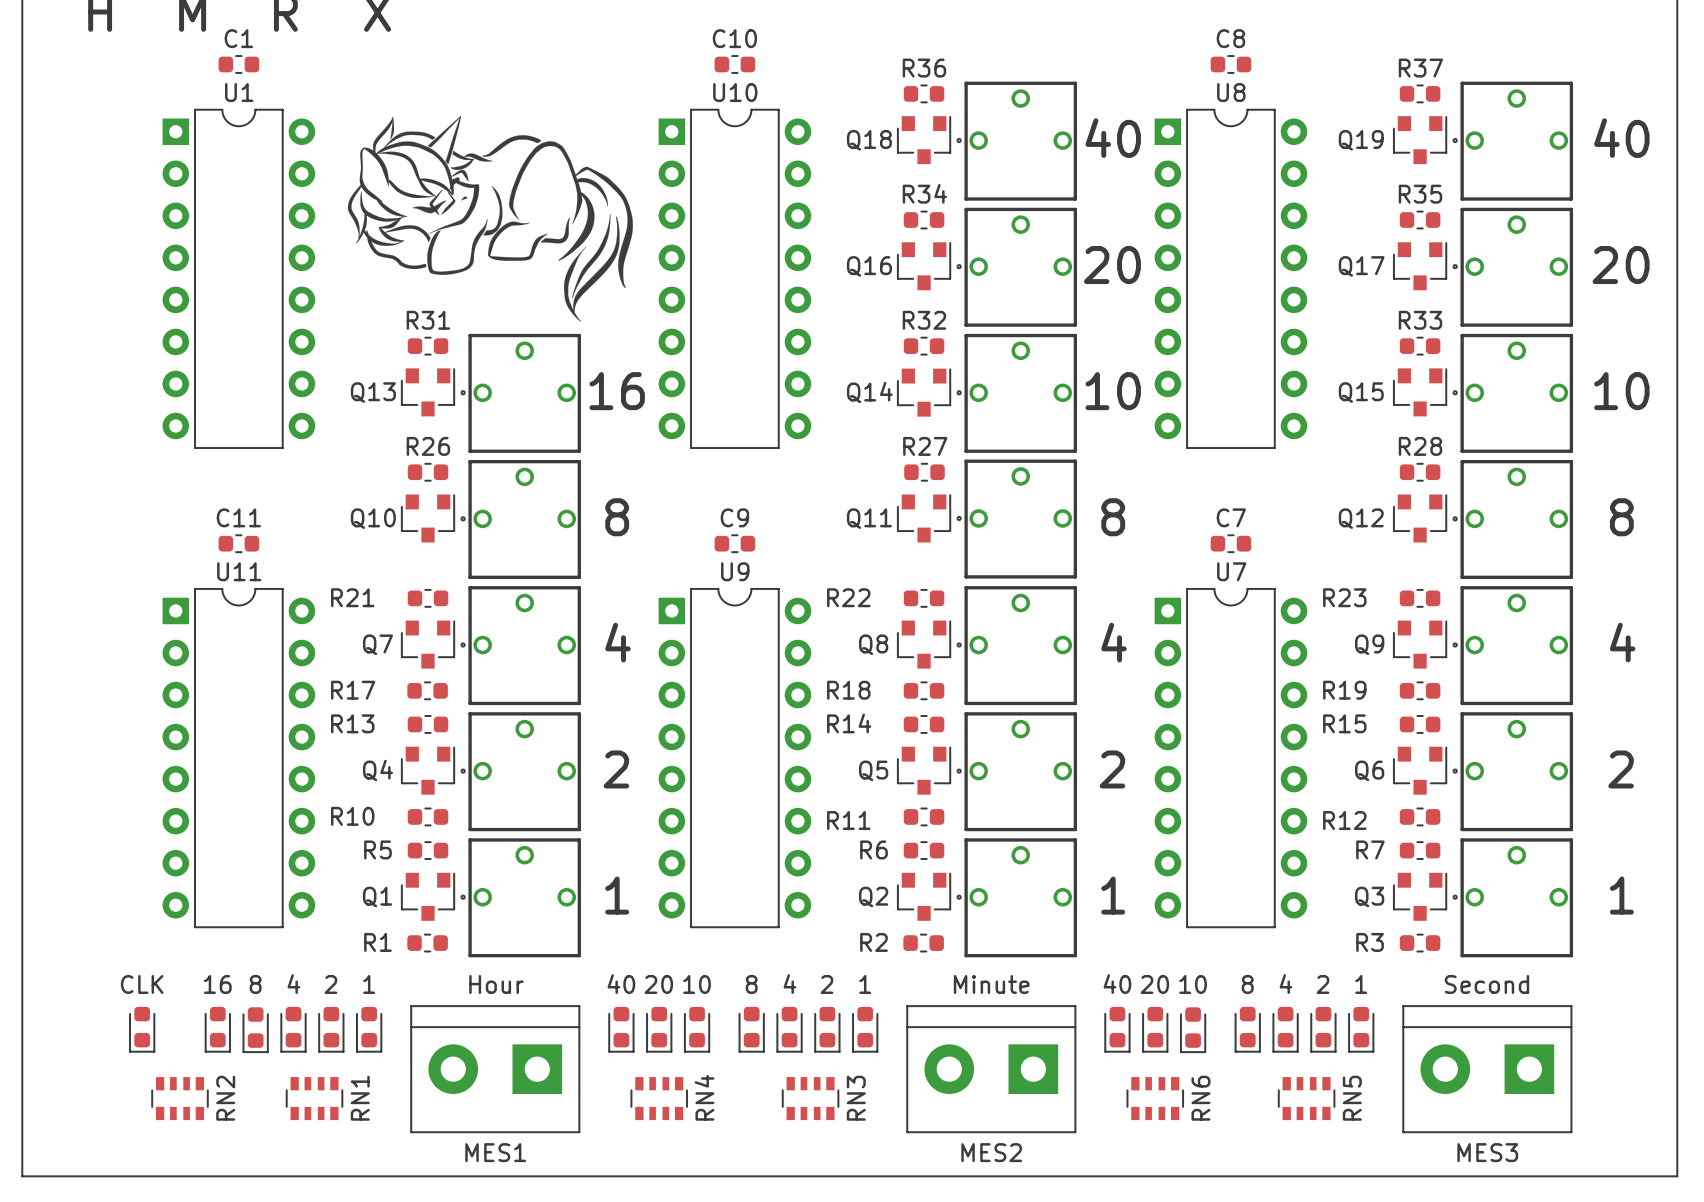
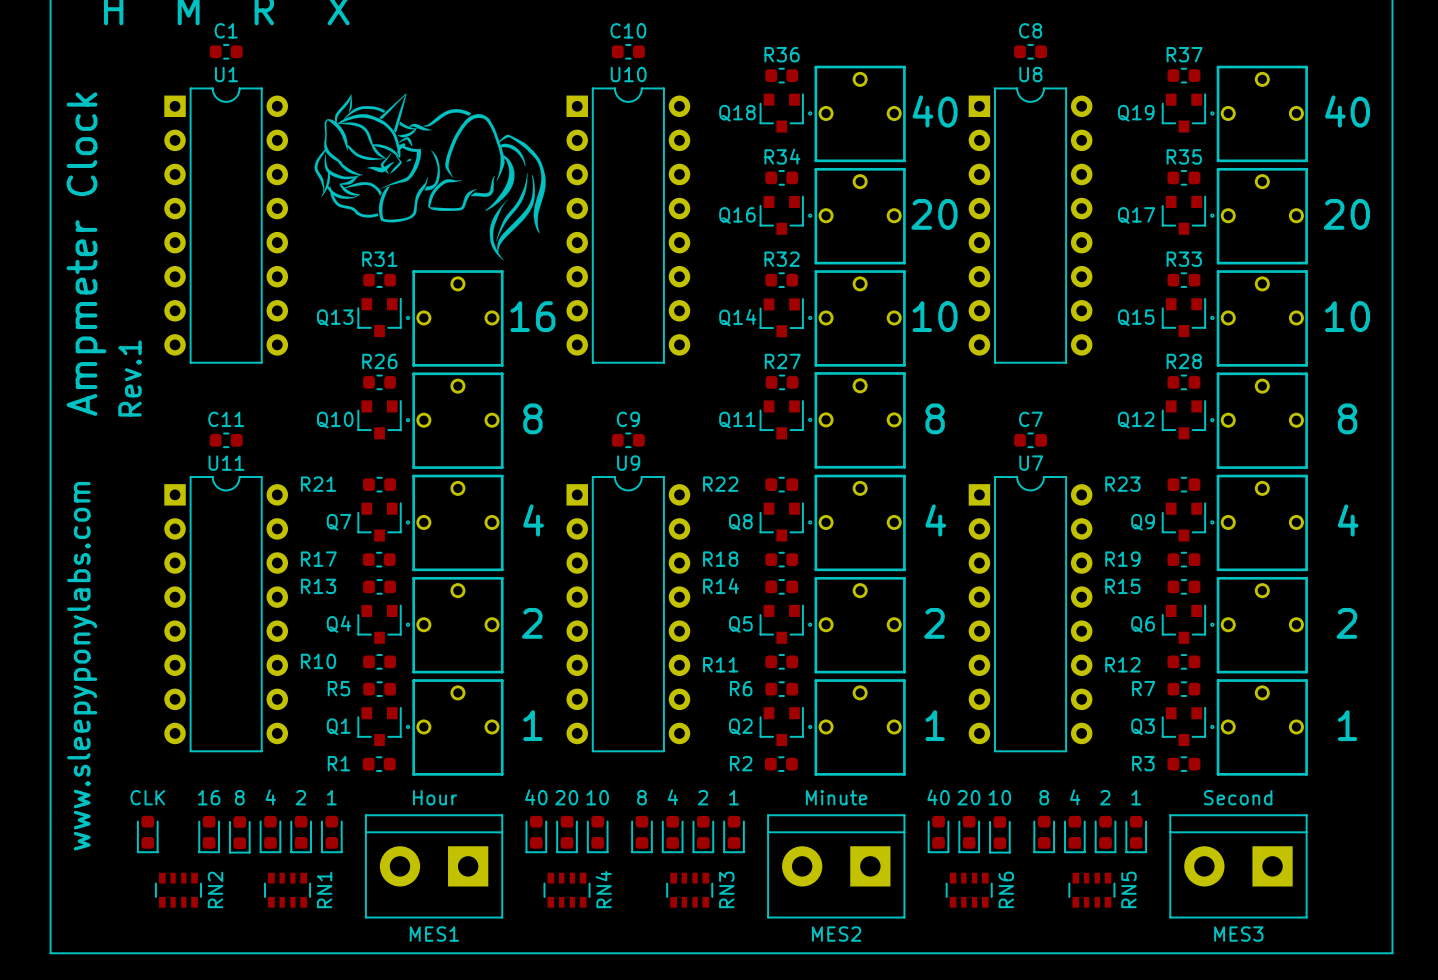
text: none -> Ampmeter Clock (86, 254)
text: none -> Rev.1 (129, 378)
text: none -> www.sleepyponylabs.com (82, 666)

